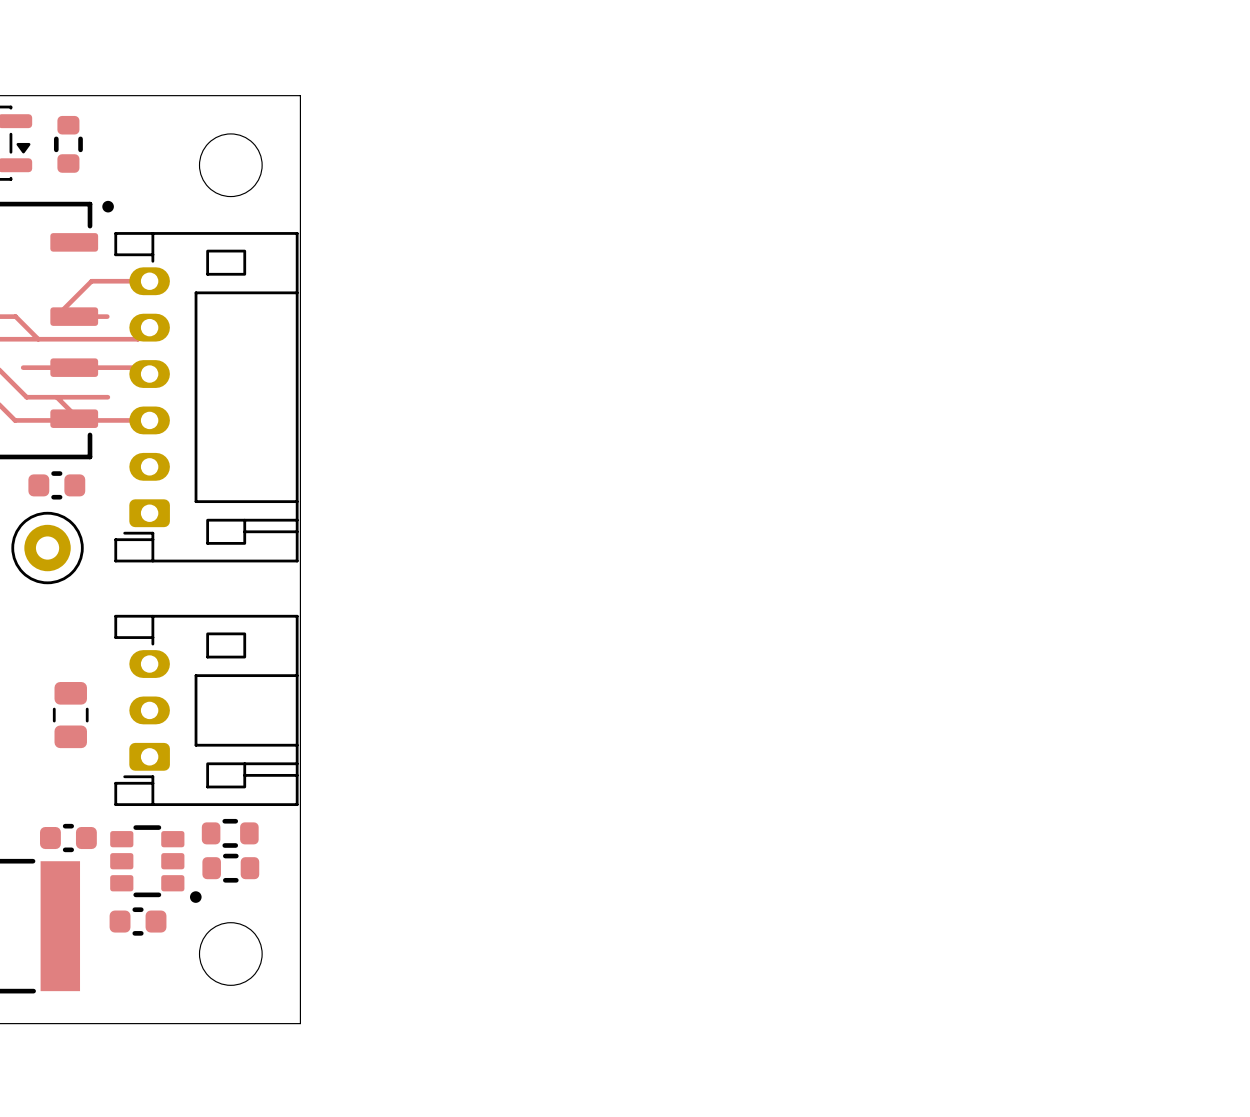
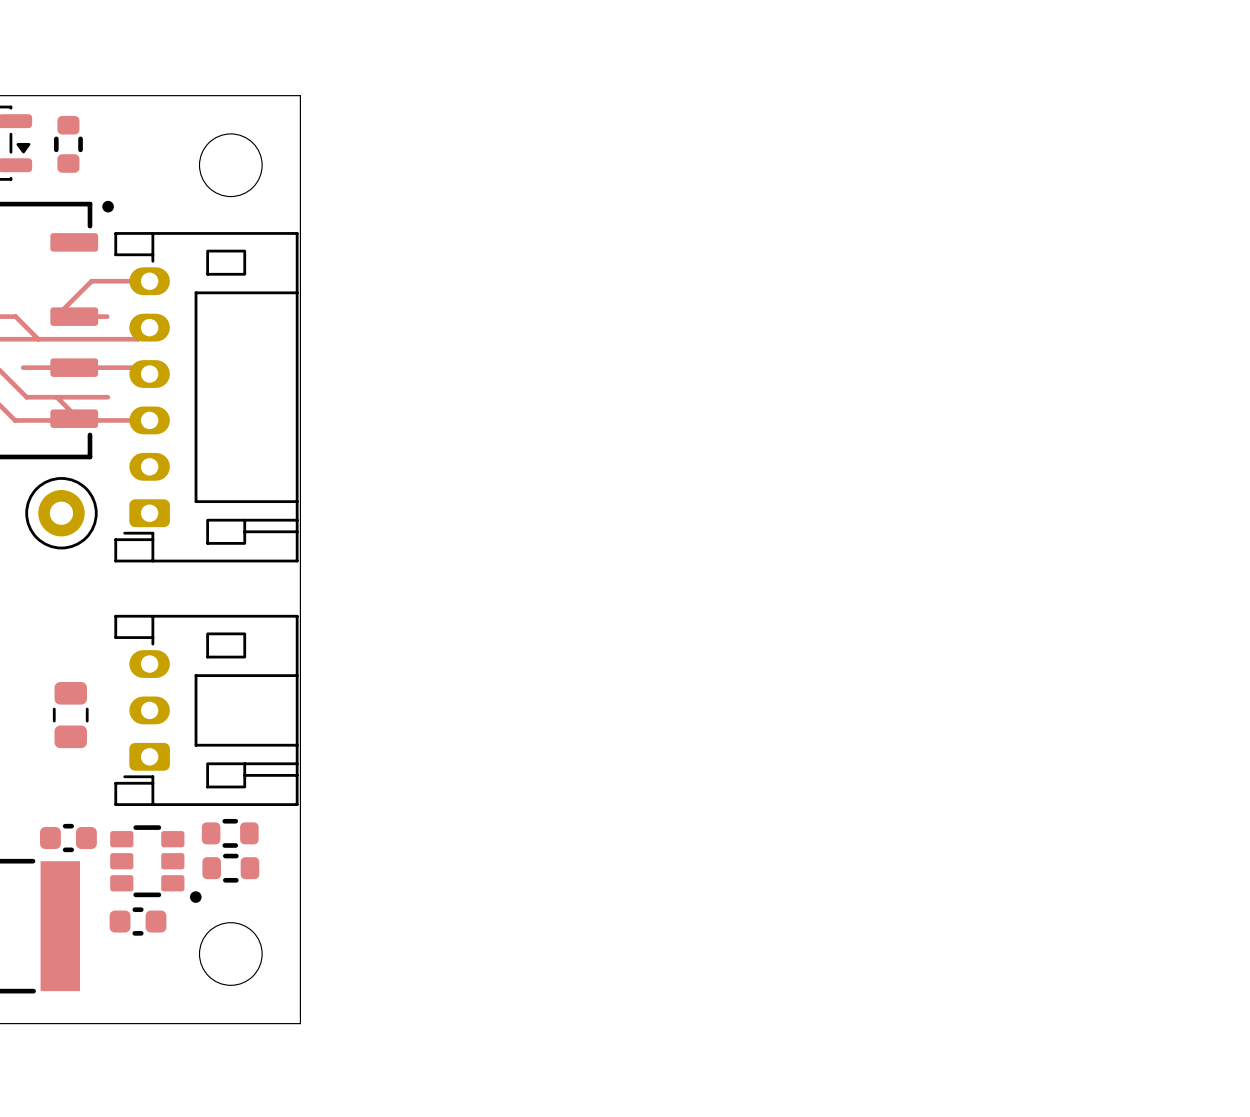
part: (56, 485) -> none
part position: (47, 548) -> (61, 513)

